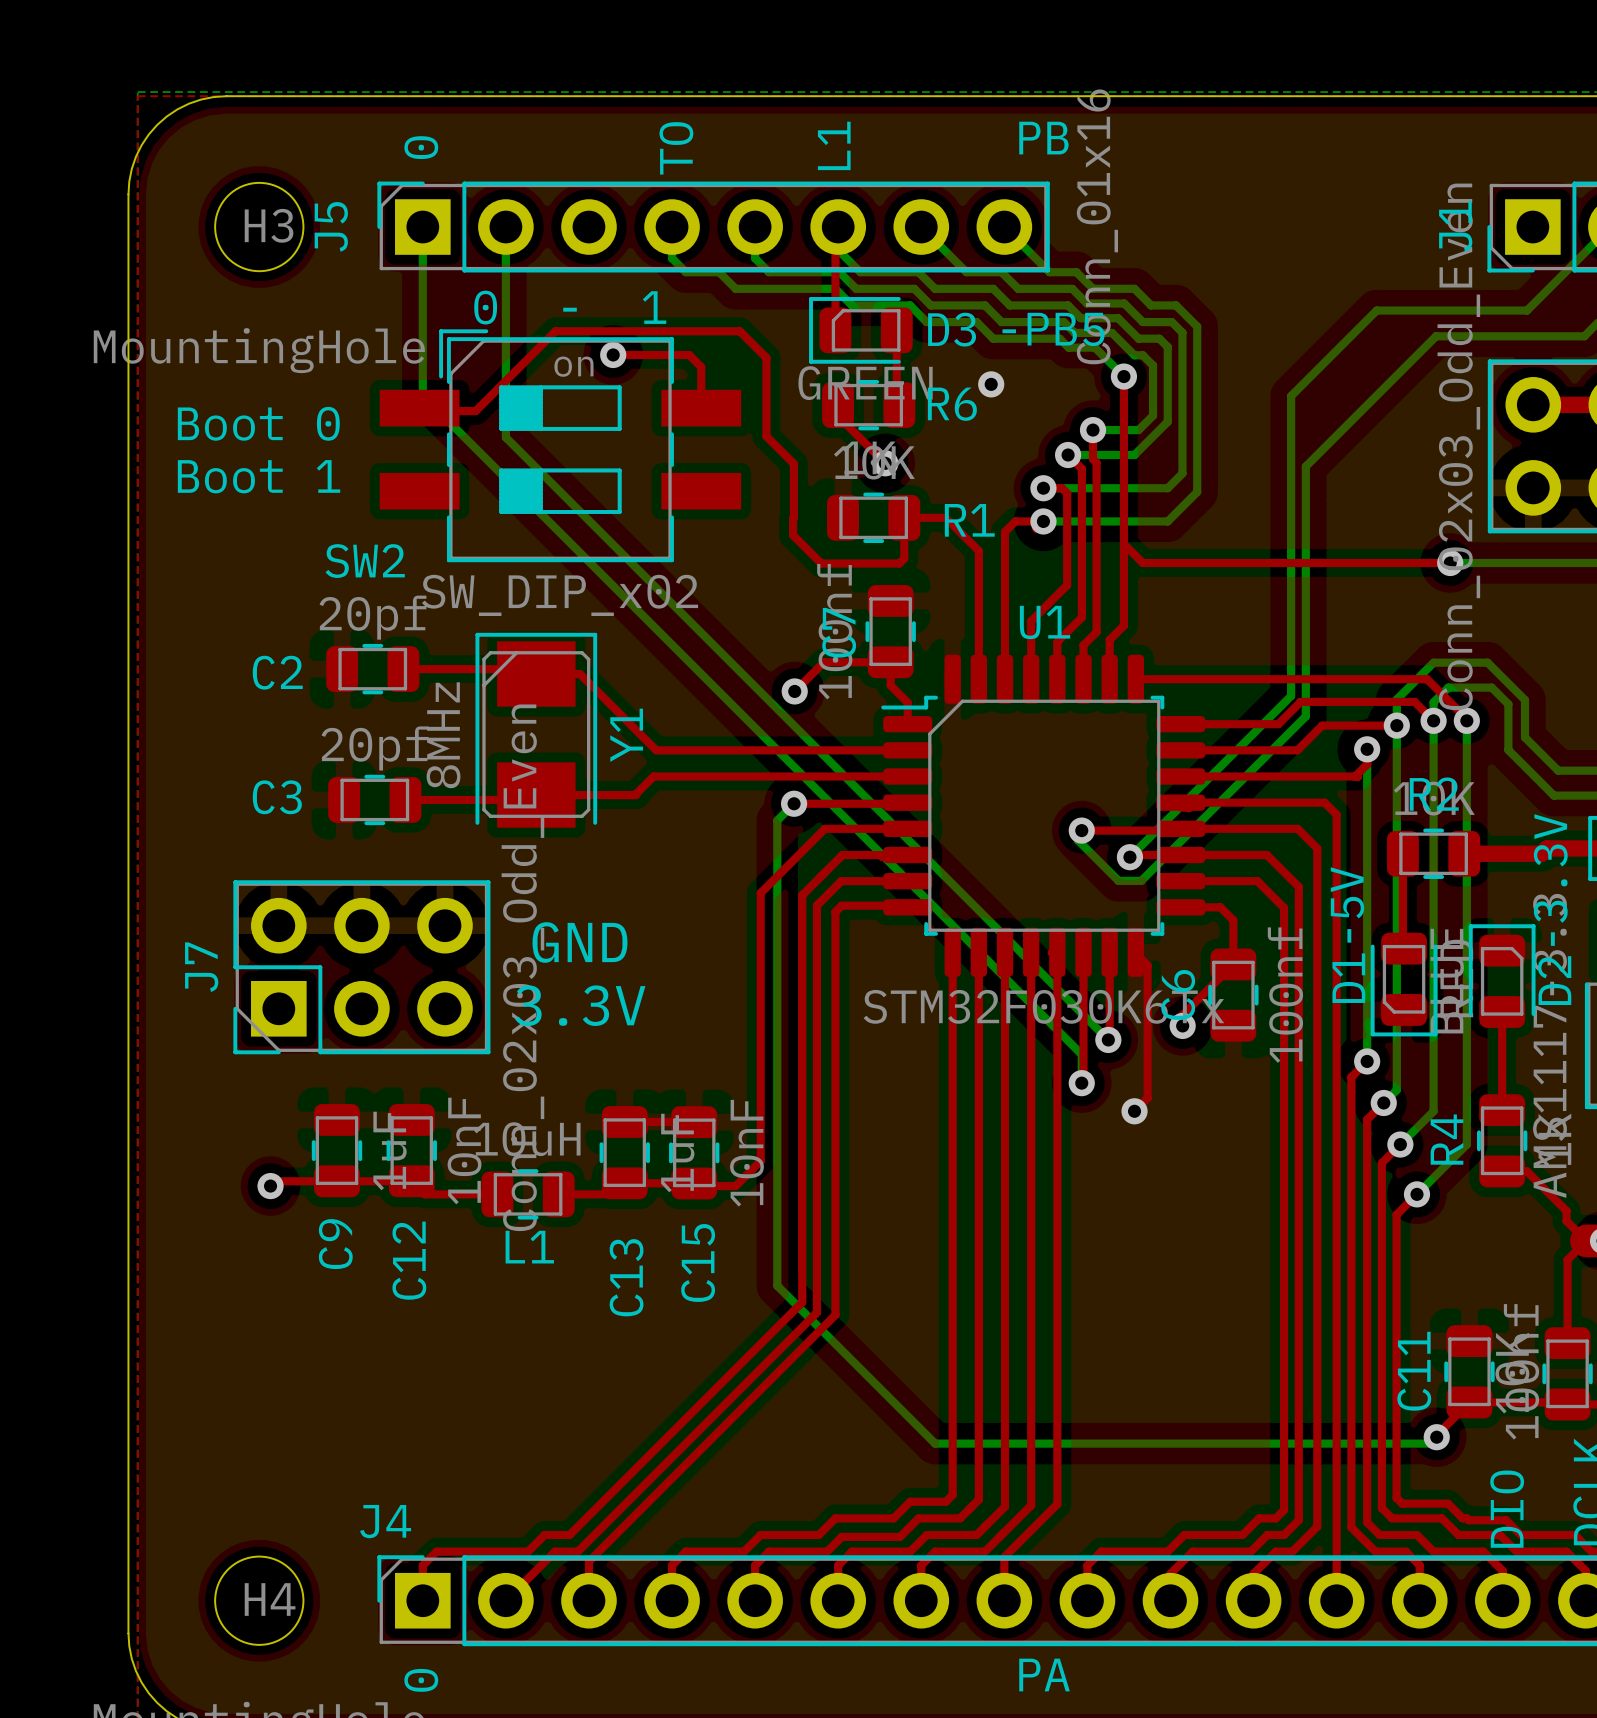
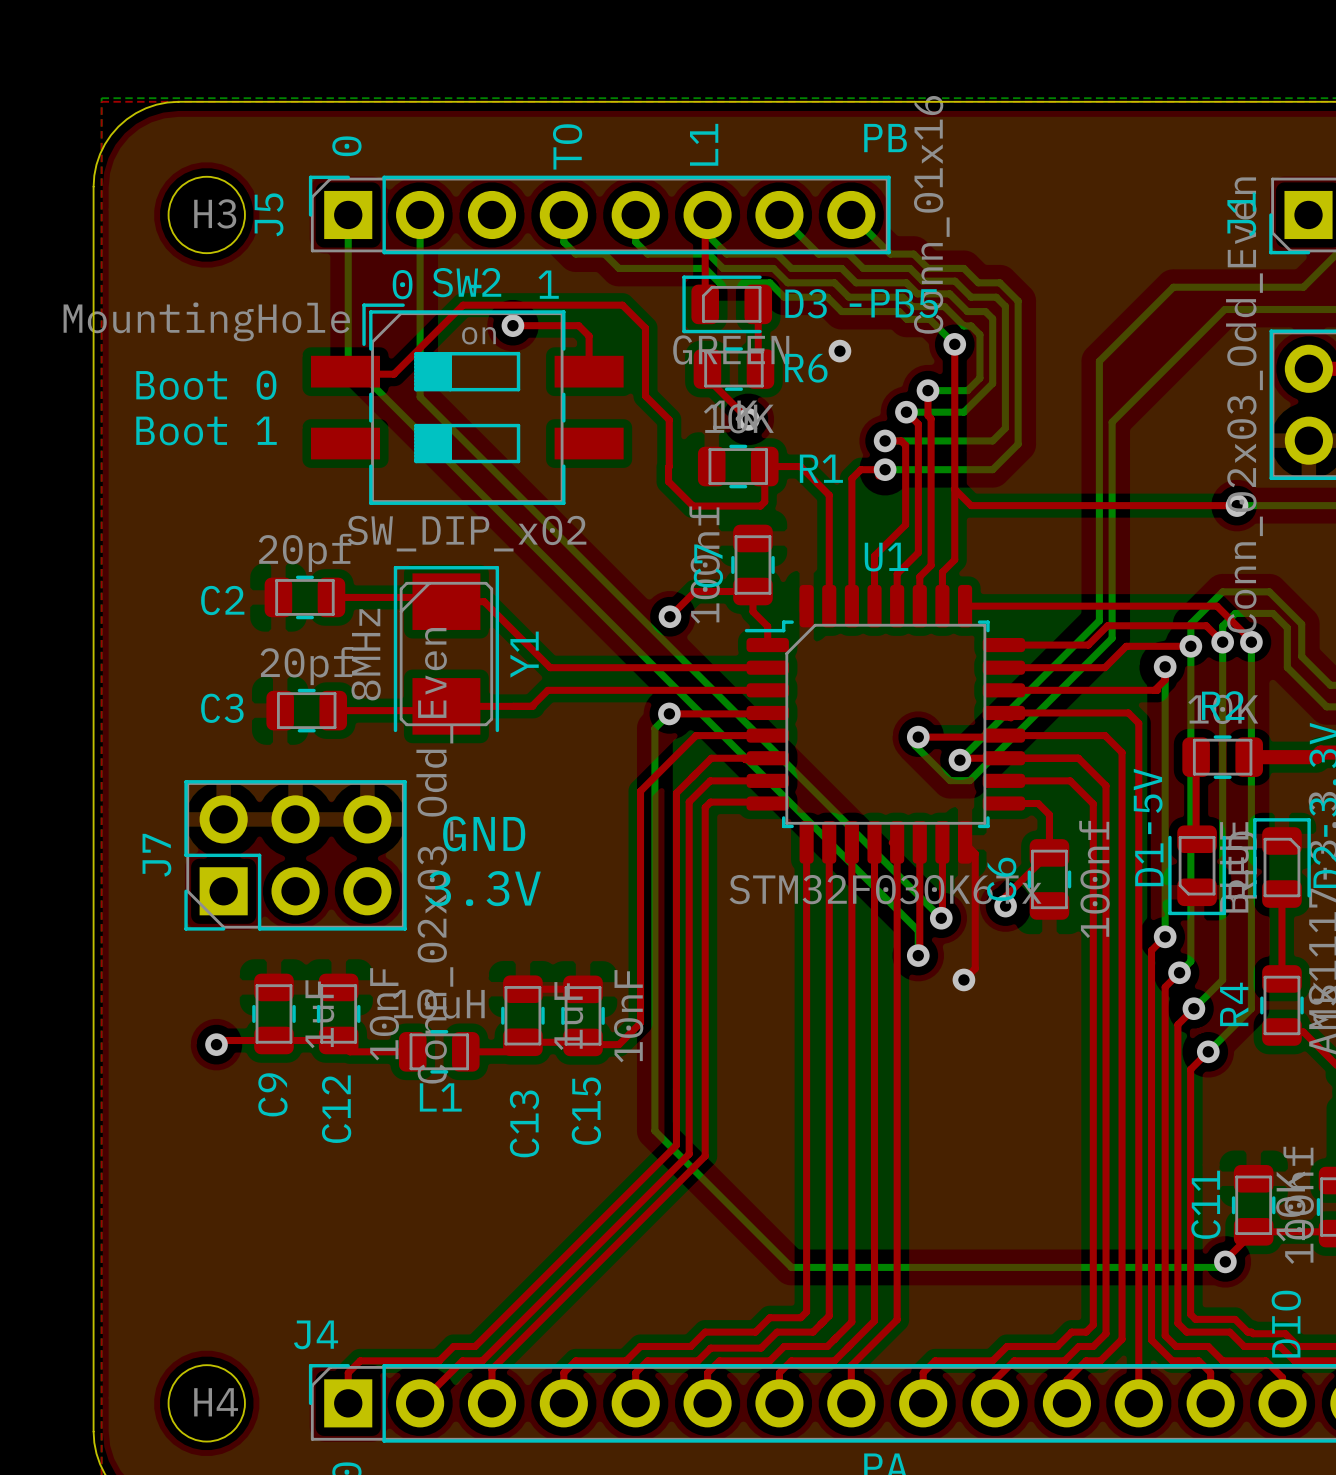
SW2 name position: SW2 (365, 561) -> SW2 (466, 282)

